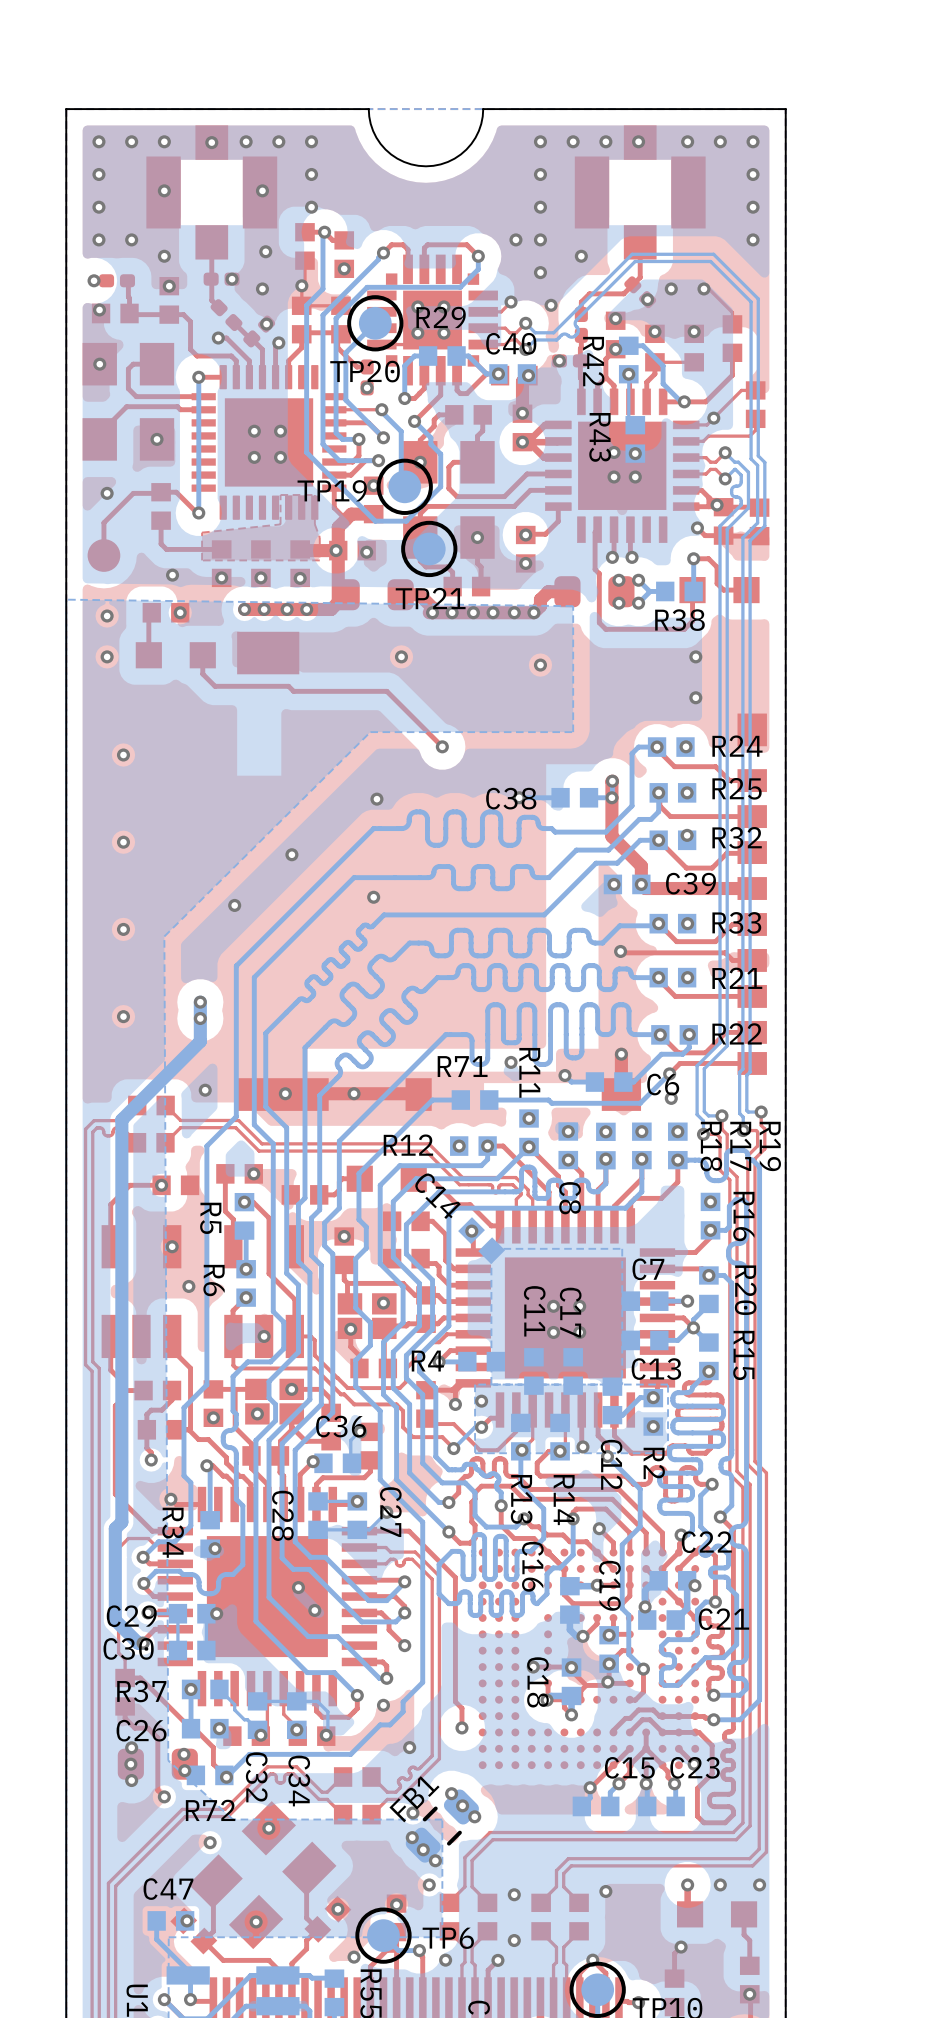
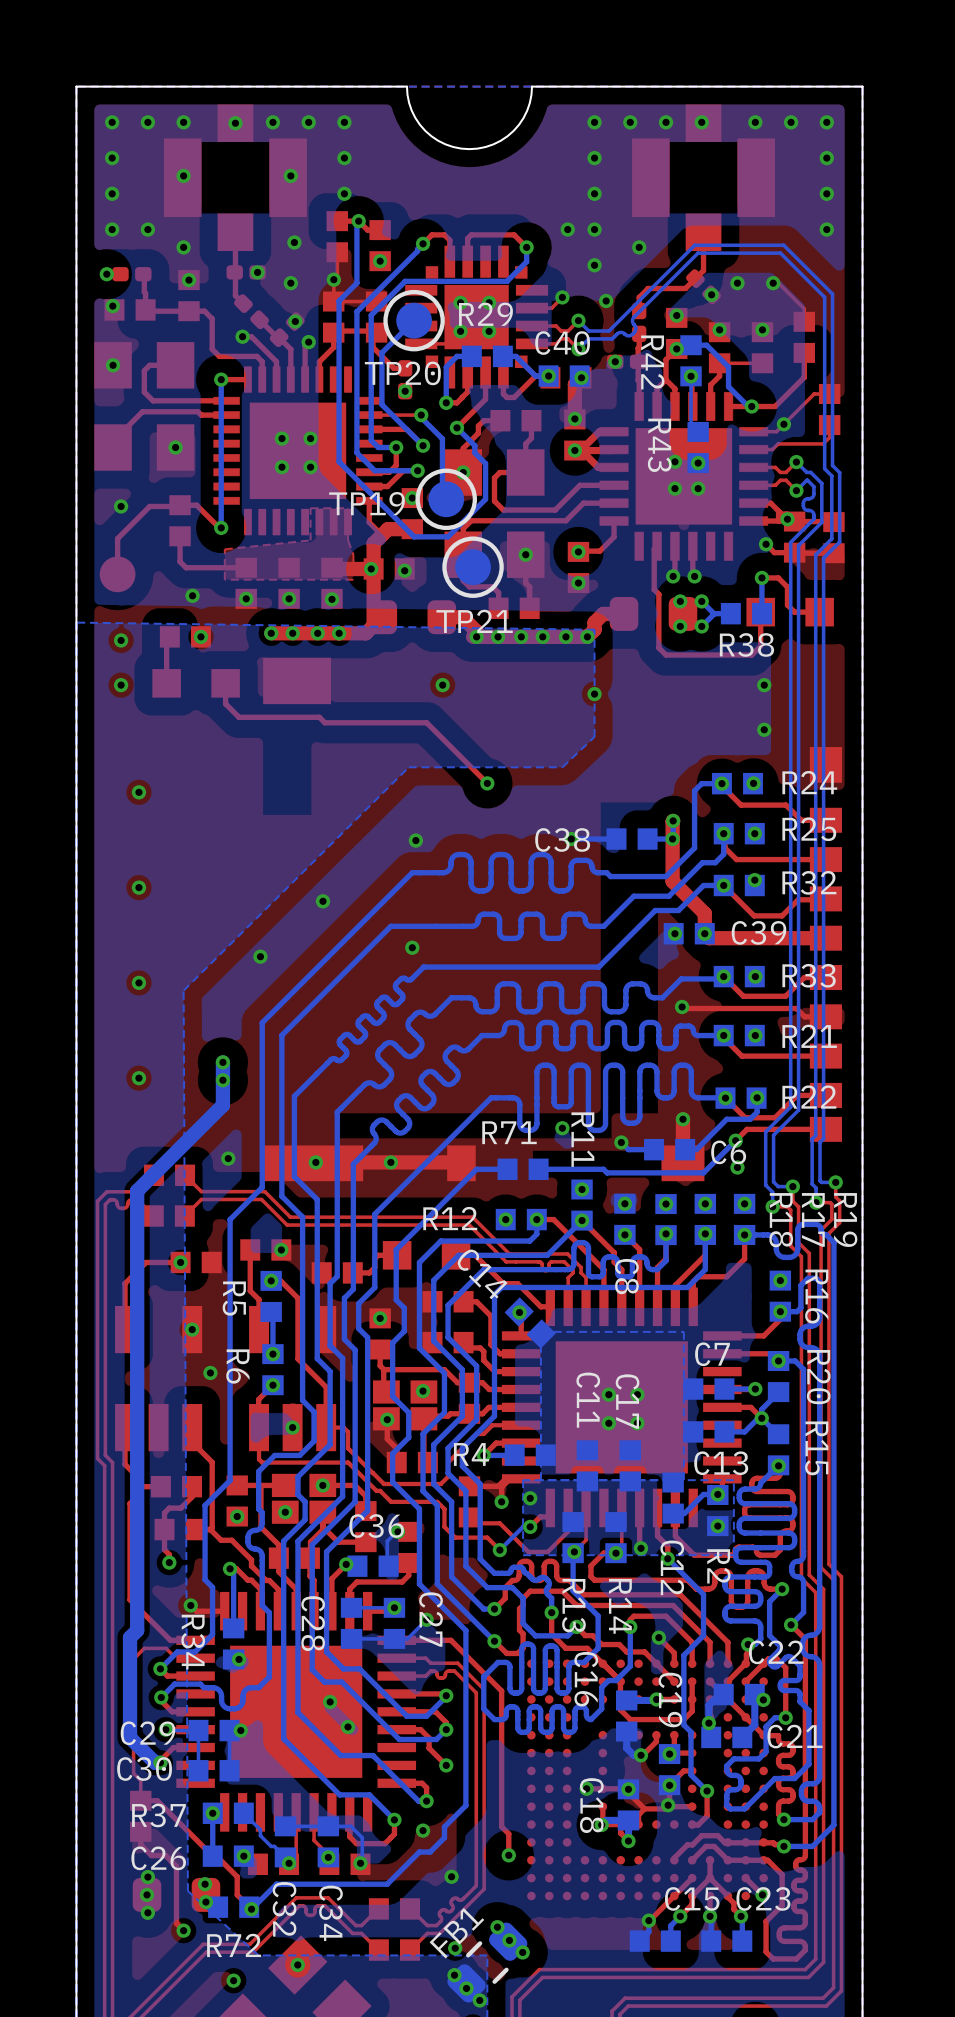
bottom zone outline: (66, 599) (573, 606) (573, 732) (511, 732) -> (76, 622) (594, 629) (594, 736) (562, 767)

